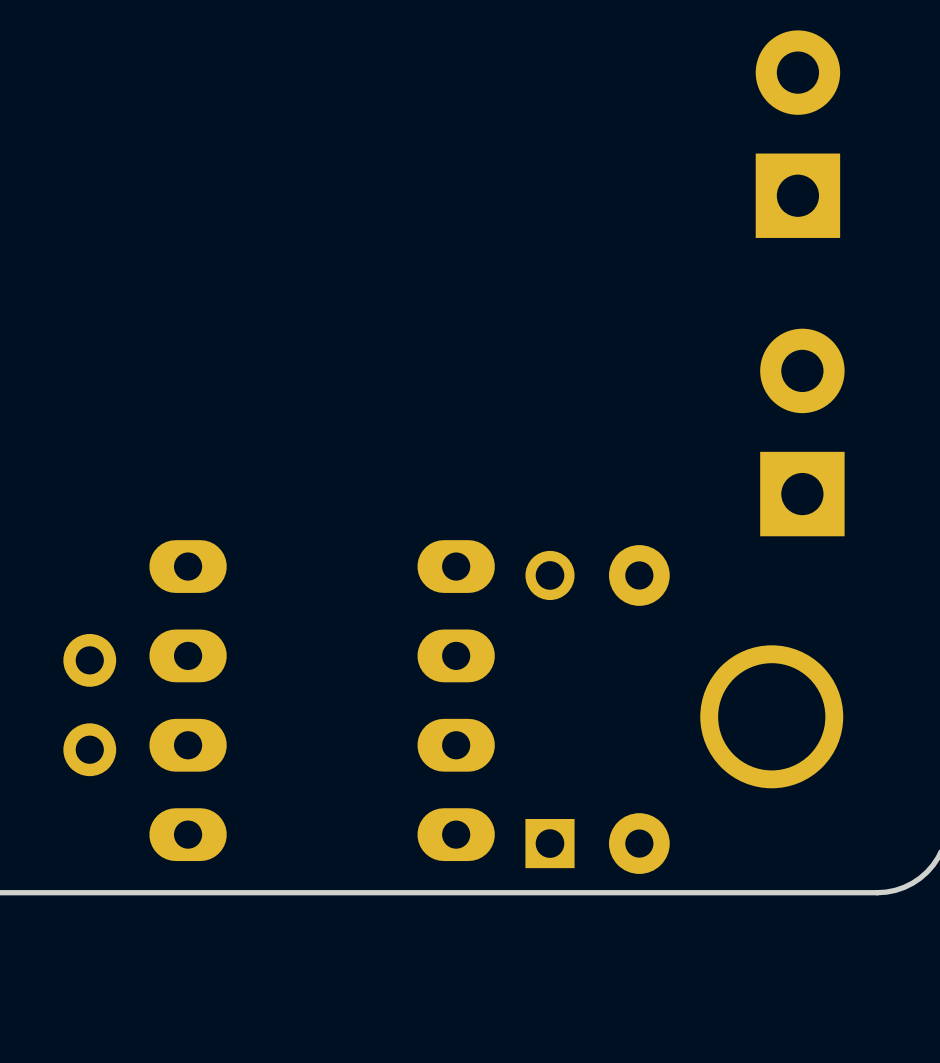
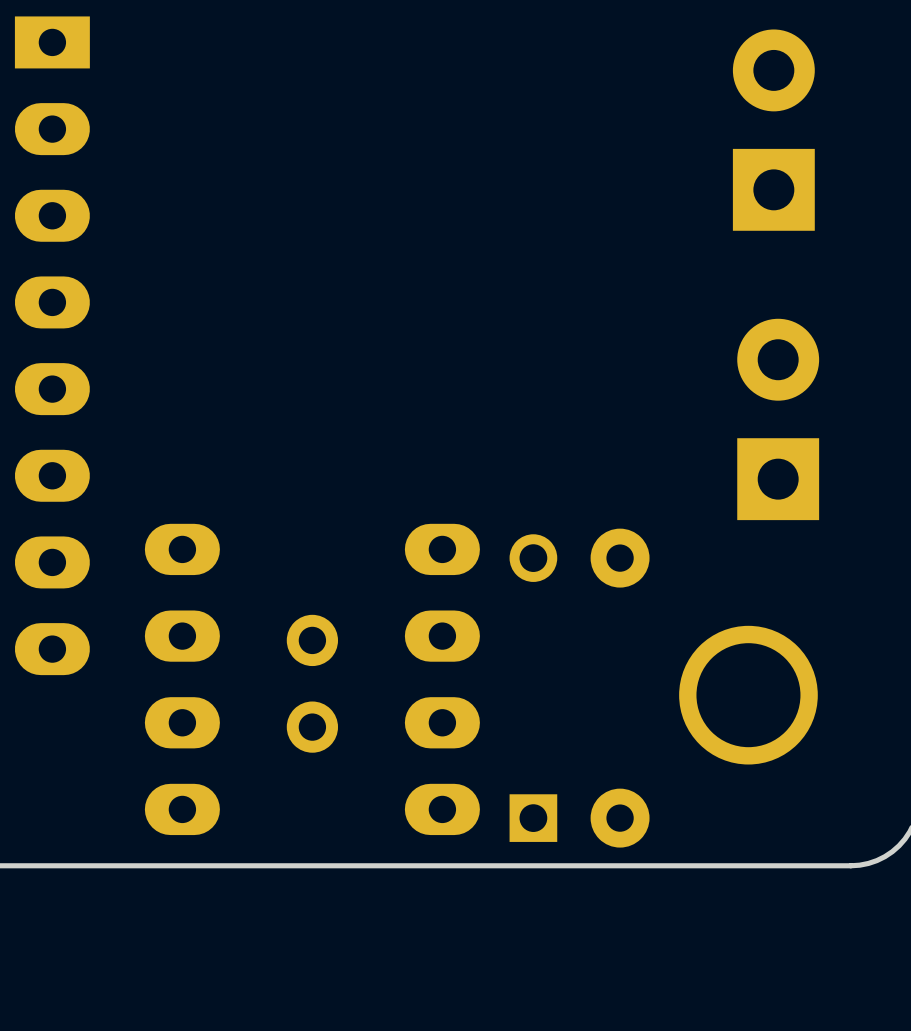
part: none -> (52, 345)
part position: (89, 705) -> (312, 683)

